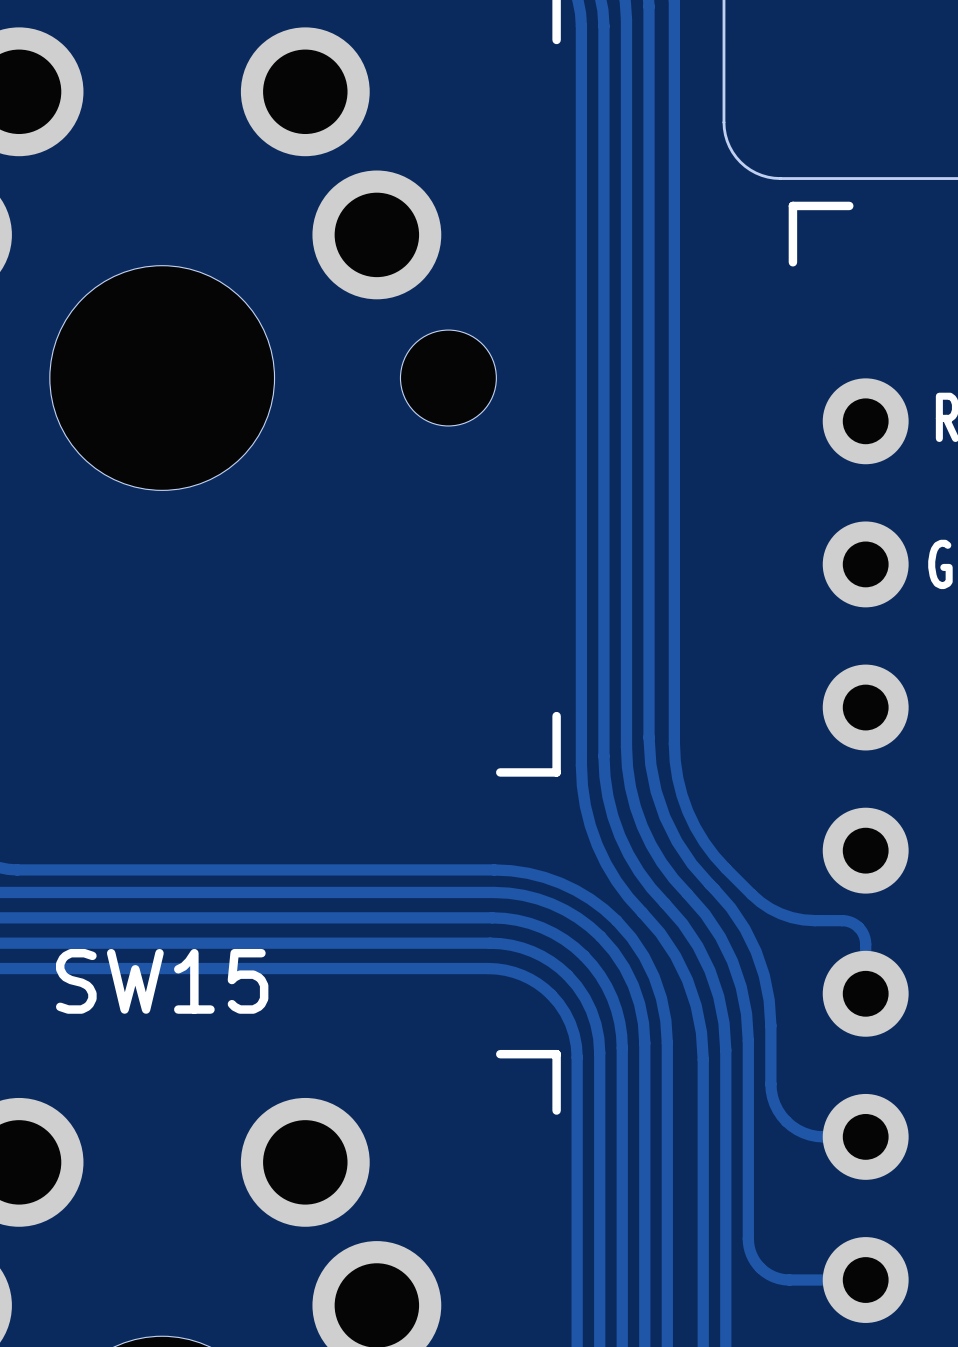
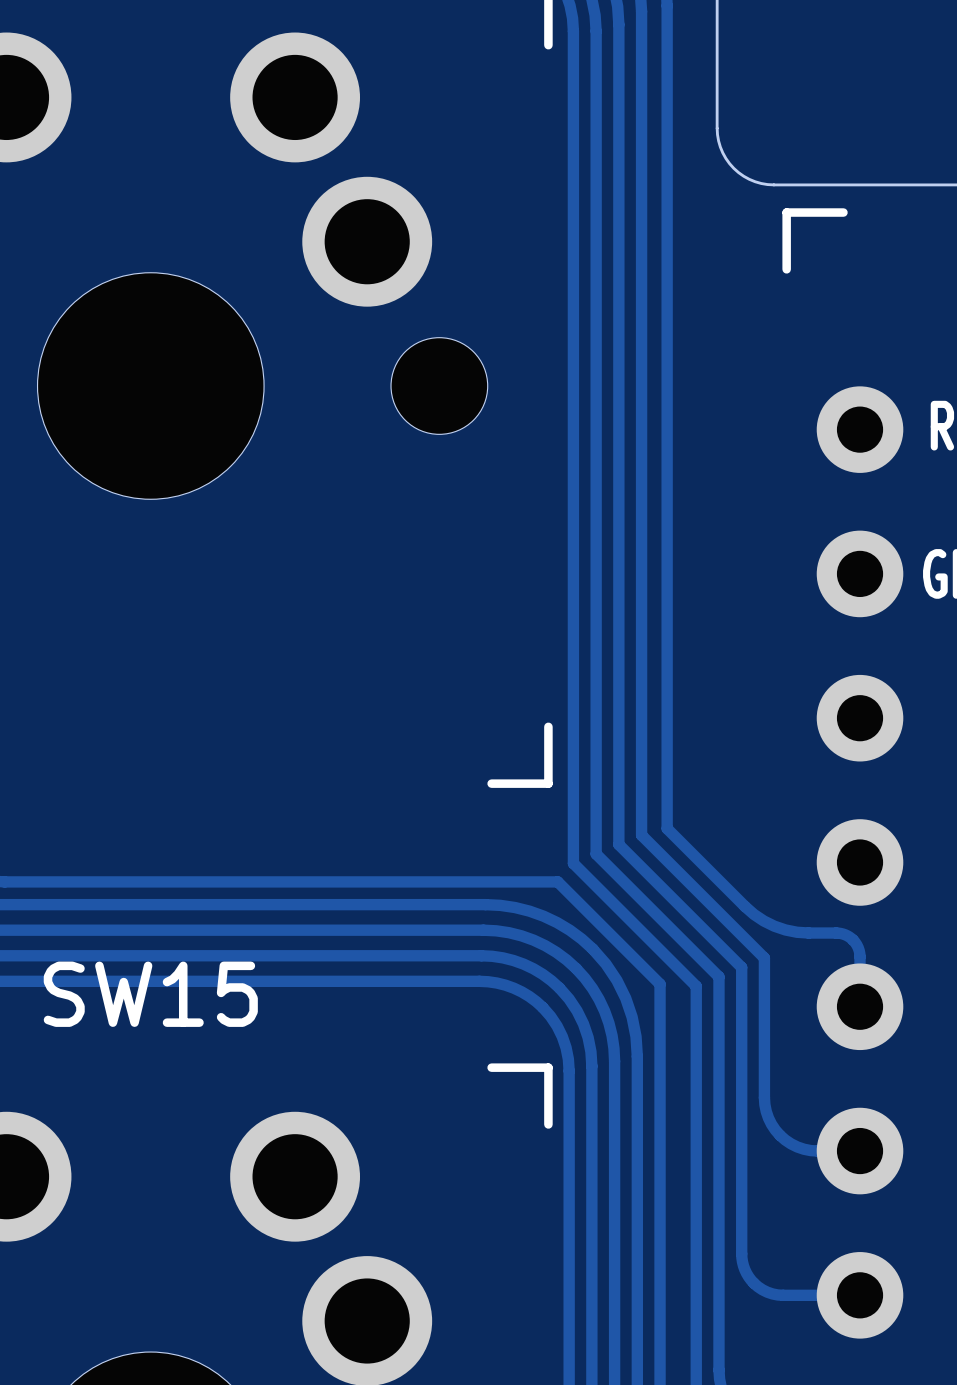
track: (649, 737) (650, 764) (656, 791) (664, 817) (676, 841) (692, 864) (709, 884) -> (641, 748) (641, 835) (703, 896)
track: (674, 743) (677, 778) (687, 811) (704, 842) (726, 868) -> (667, 754) (667, 828) (719, 880)
track: (626, 746) (630, 787) (642, 826) (661, 862) (705, 914) (720, 936) (732, 961) (741, 987) (746, 1013) (748, 1040) -> (618, 757) (618, 844) (741, 967) (741, 1054)
track: (603, 756) (607, 796) (619, 835) (638, 871) (682, 923) (697, 946) (709, 970) (718, 996) (724, 1023) (725, 1050) -> (596, 767) (596, 854) (718, 976) (718, 1063)
track: (581, 765) (585, 806) (597, 845) (616, 881) (660, 933) (675, 955) (687, 980) (696, 1005) (701, 1032) (703, 1059) -> (573, 776) (573, 863) (696, 986) (696, 1073)
track: (494, 869) (527, 873) (560, 883) (590, 899) (616, 920) (631, 937) (654, 976) (665, 1020) (667, 1043) -> (485, 881) (557, 881) (660, 984) (660, 1056)
track: (714, 888) (730, 907) (744, 928) (756, 951) (764, 975) (769, 1000) (770, 1025) -> (707, 900) (764, 958) (764, 1038)

